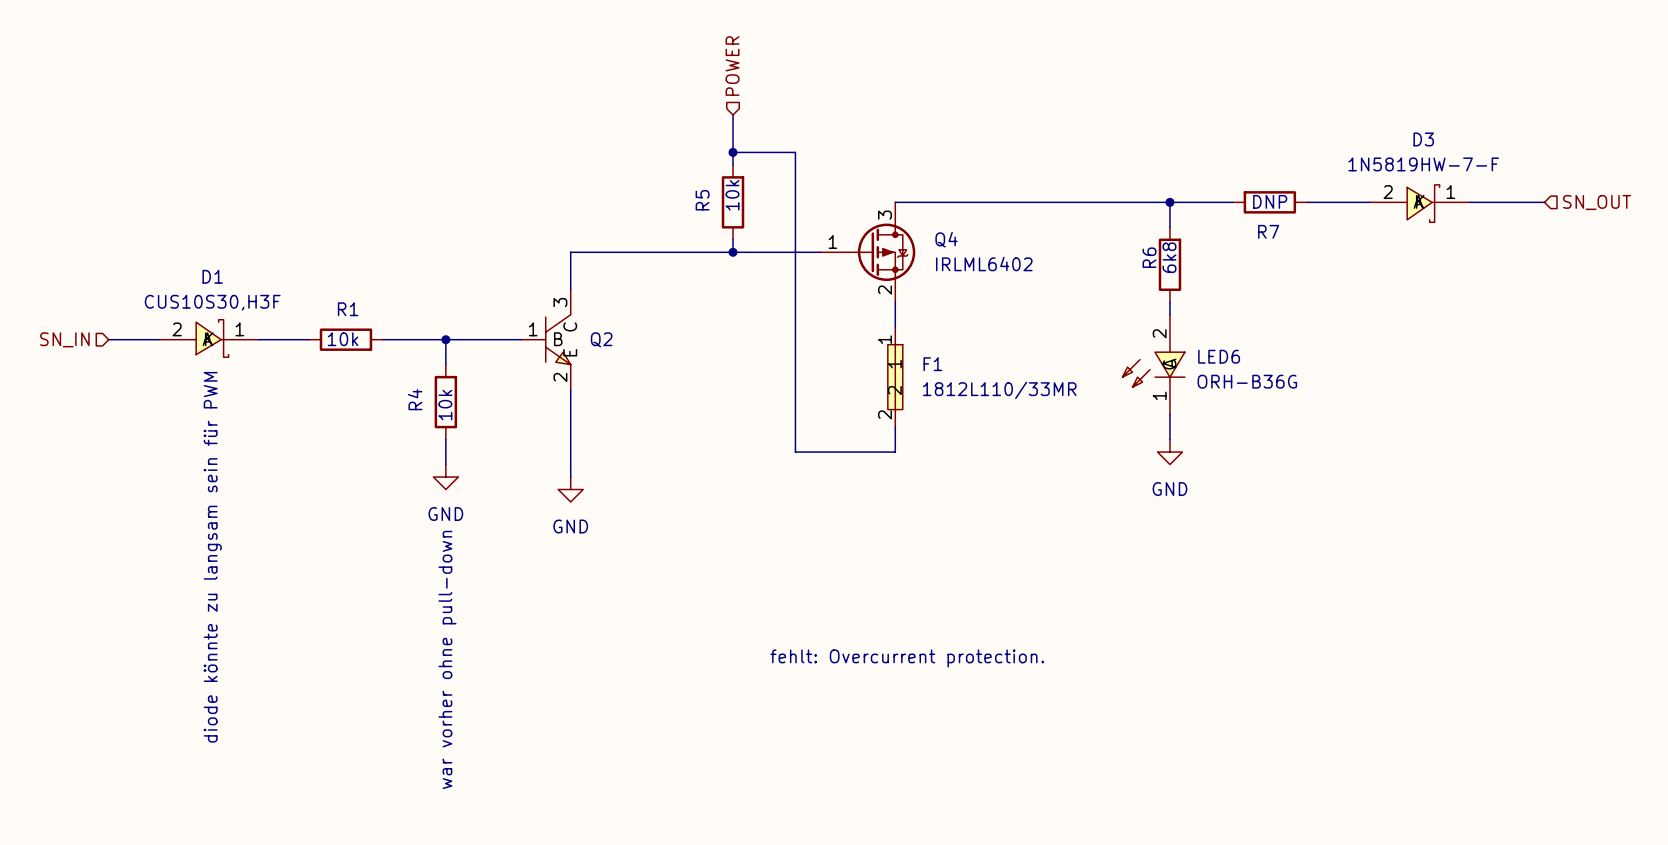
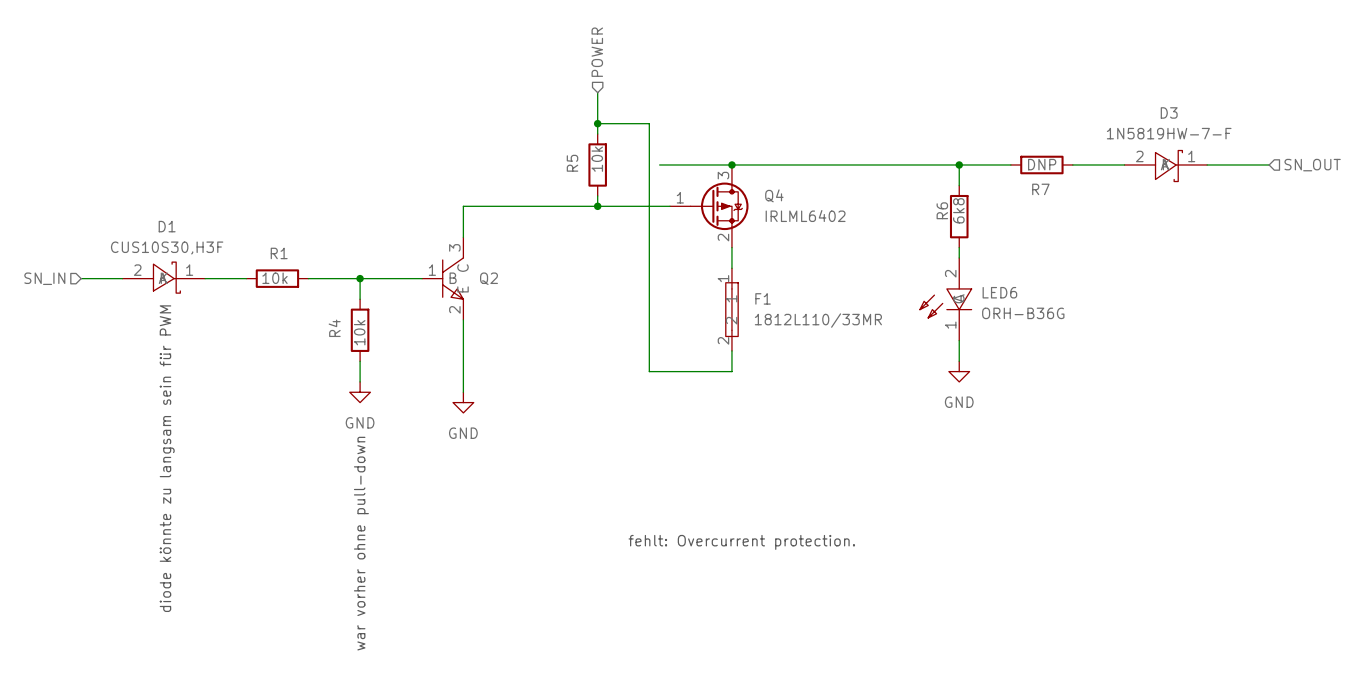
wire: none -> (659, 164) (731, 164)
junction: none -> (731, 164)

